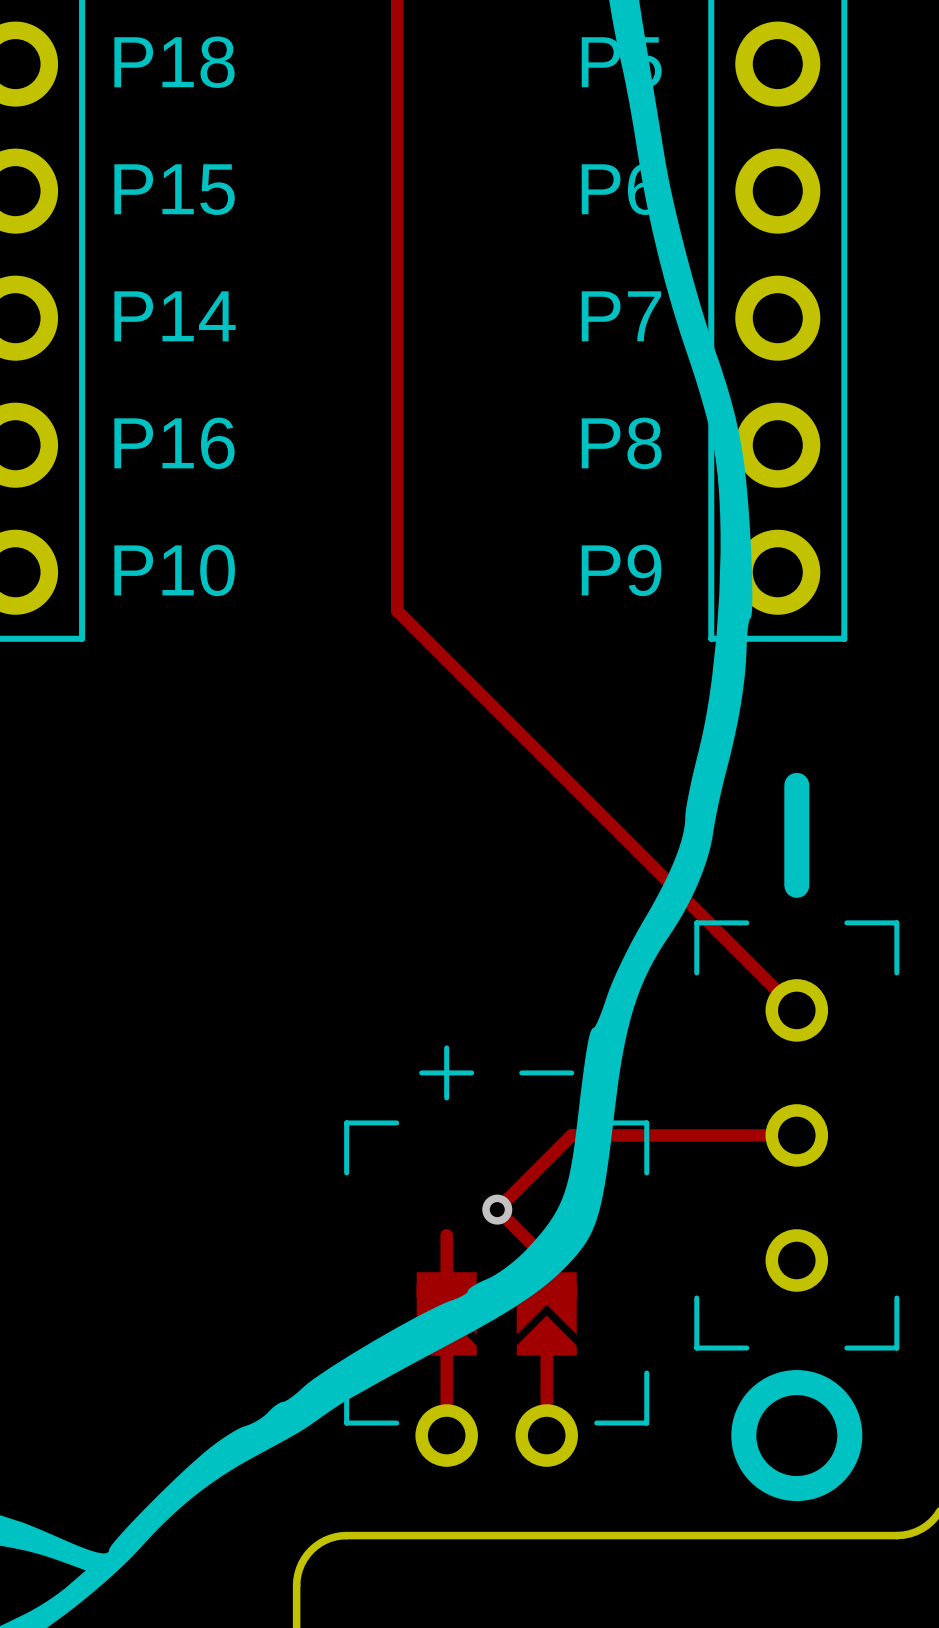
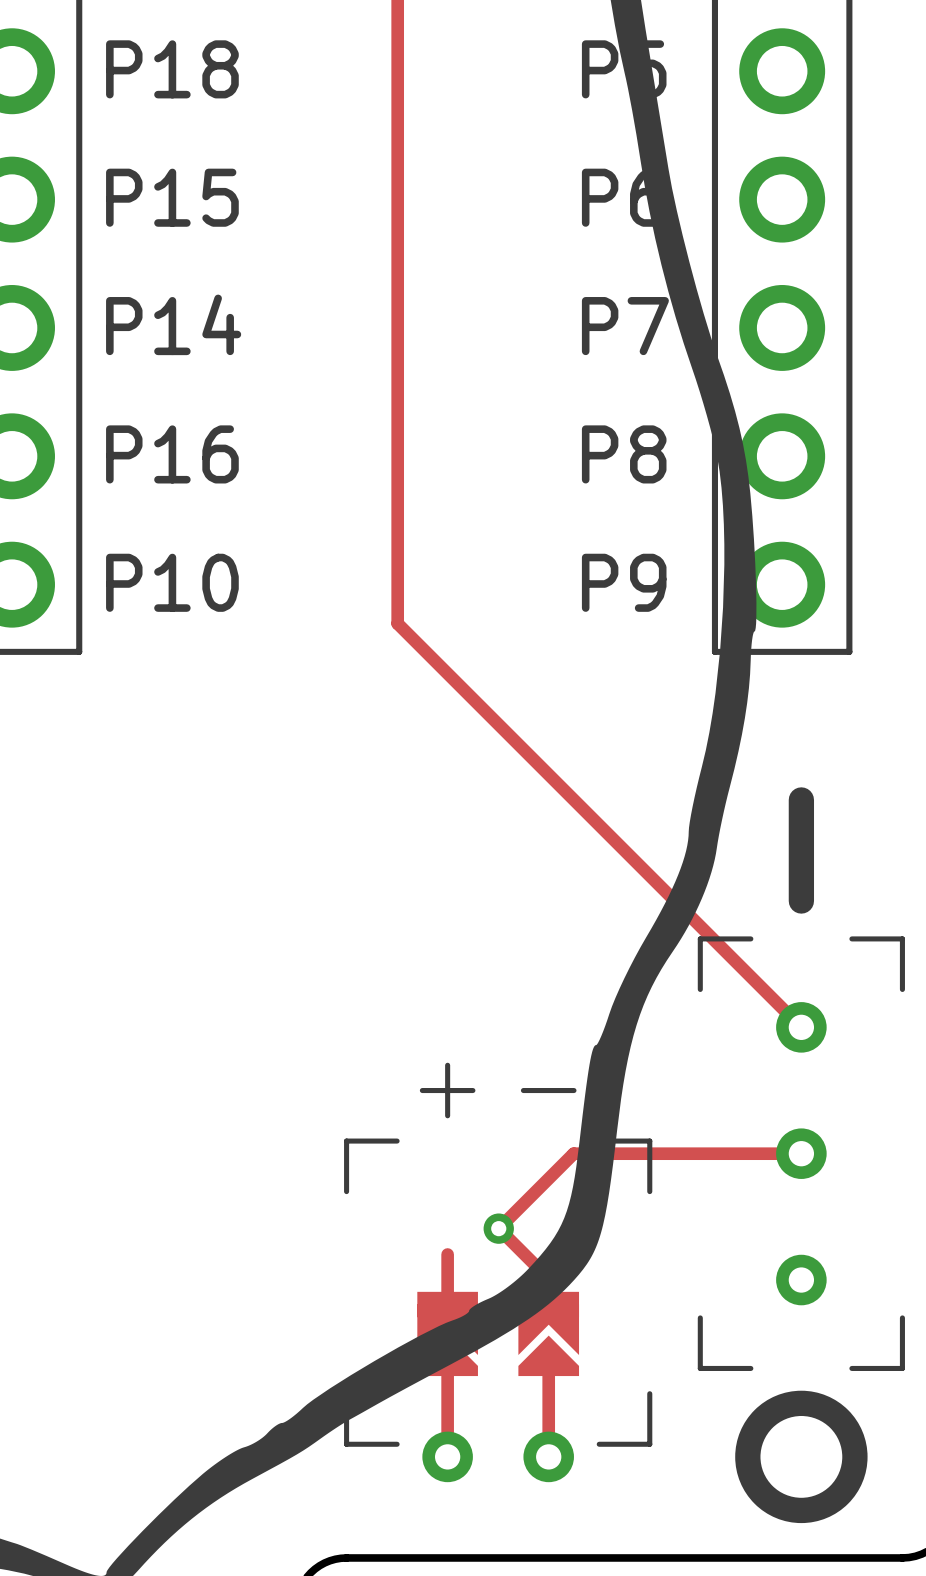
part footprint: [694, 772, 900, 1502] -> [697, 787, 905, 1524]
part footprint: [344, 1045, 650, 1467] -> [344, 1062, 653, 1483]

